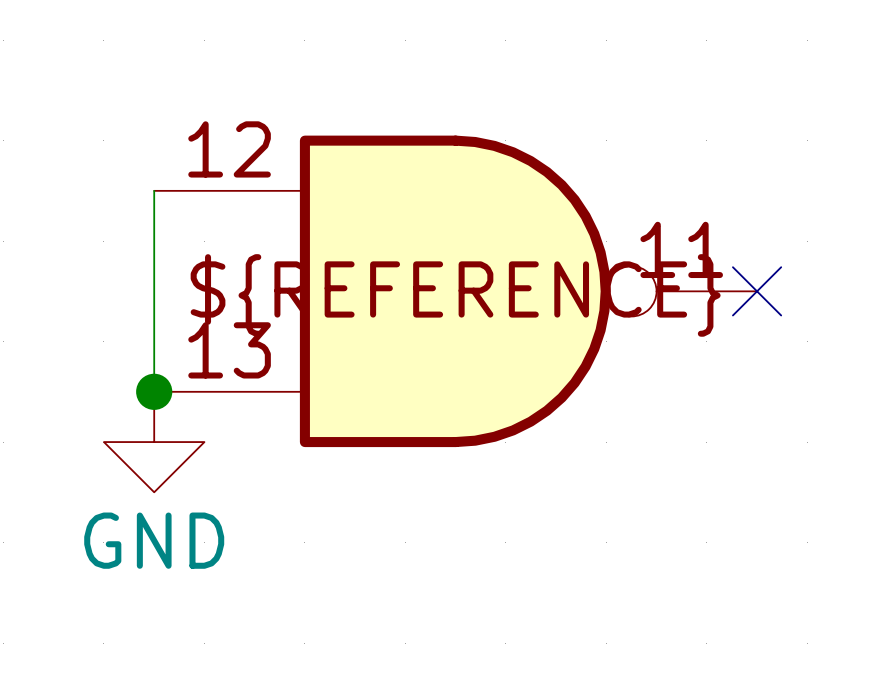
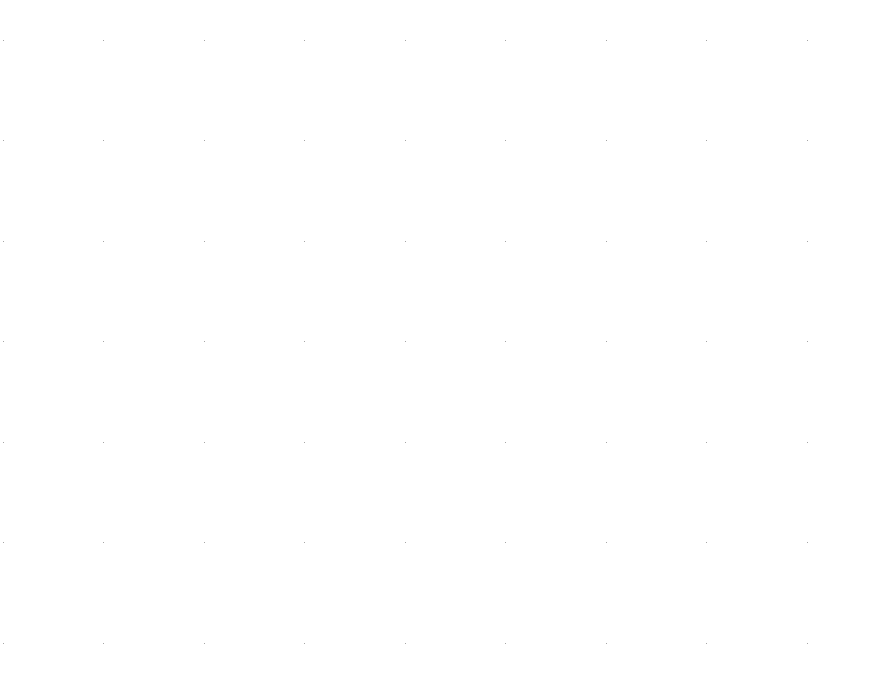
wire: (154, 190) (154, 391) -> none
part: (455, 291) -> none
no-connect mark: (757, 291) -> none
junction: (154, 391) -> none
power symbol: GND (154, 442) -> none

